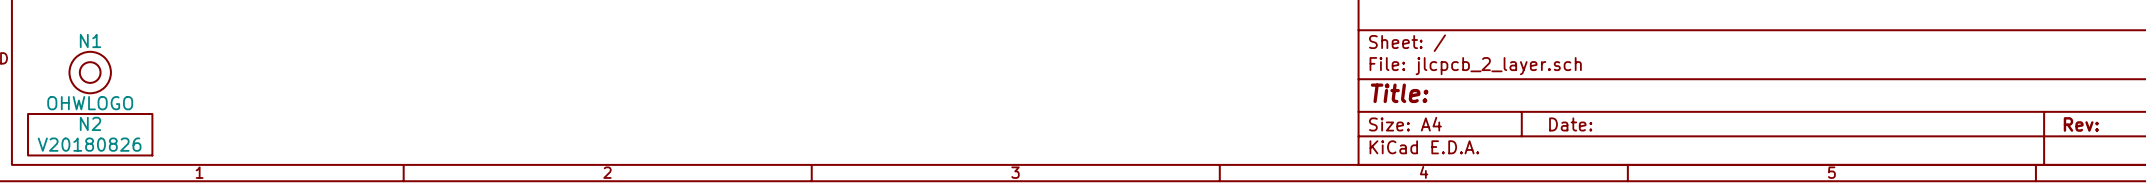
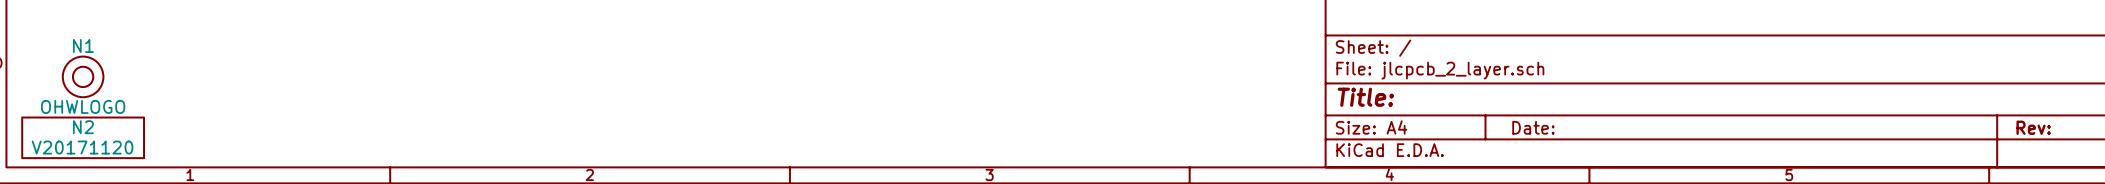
N2 value: V20180826 (89, 144) -> V20171120 (82, 147)

